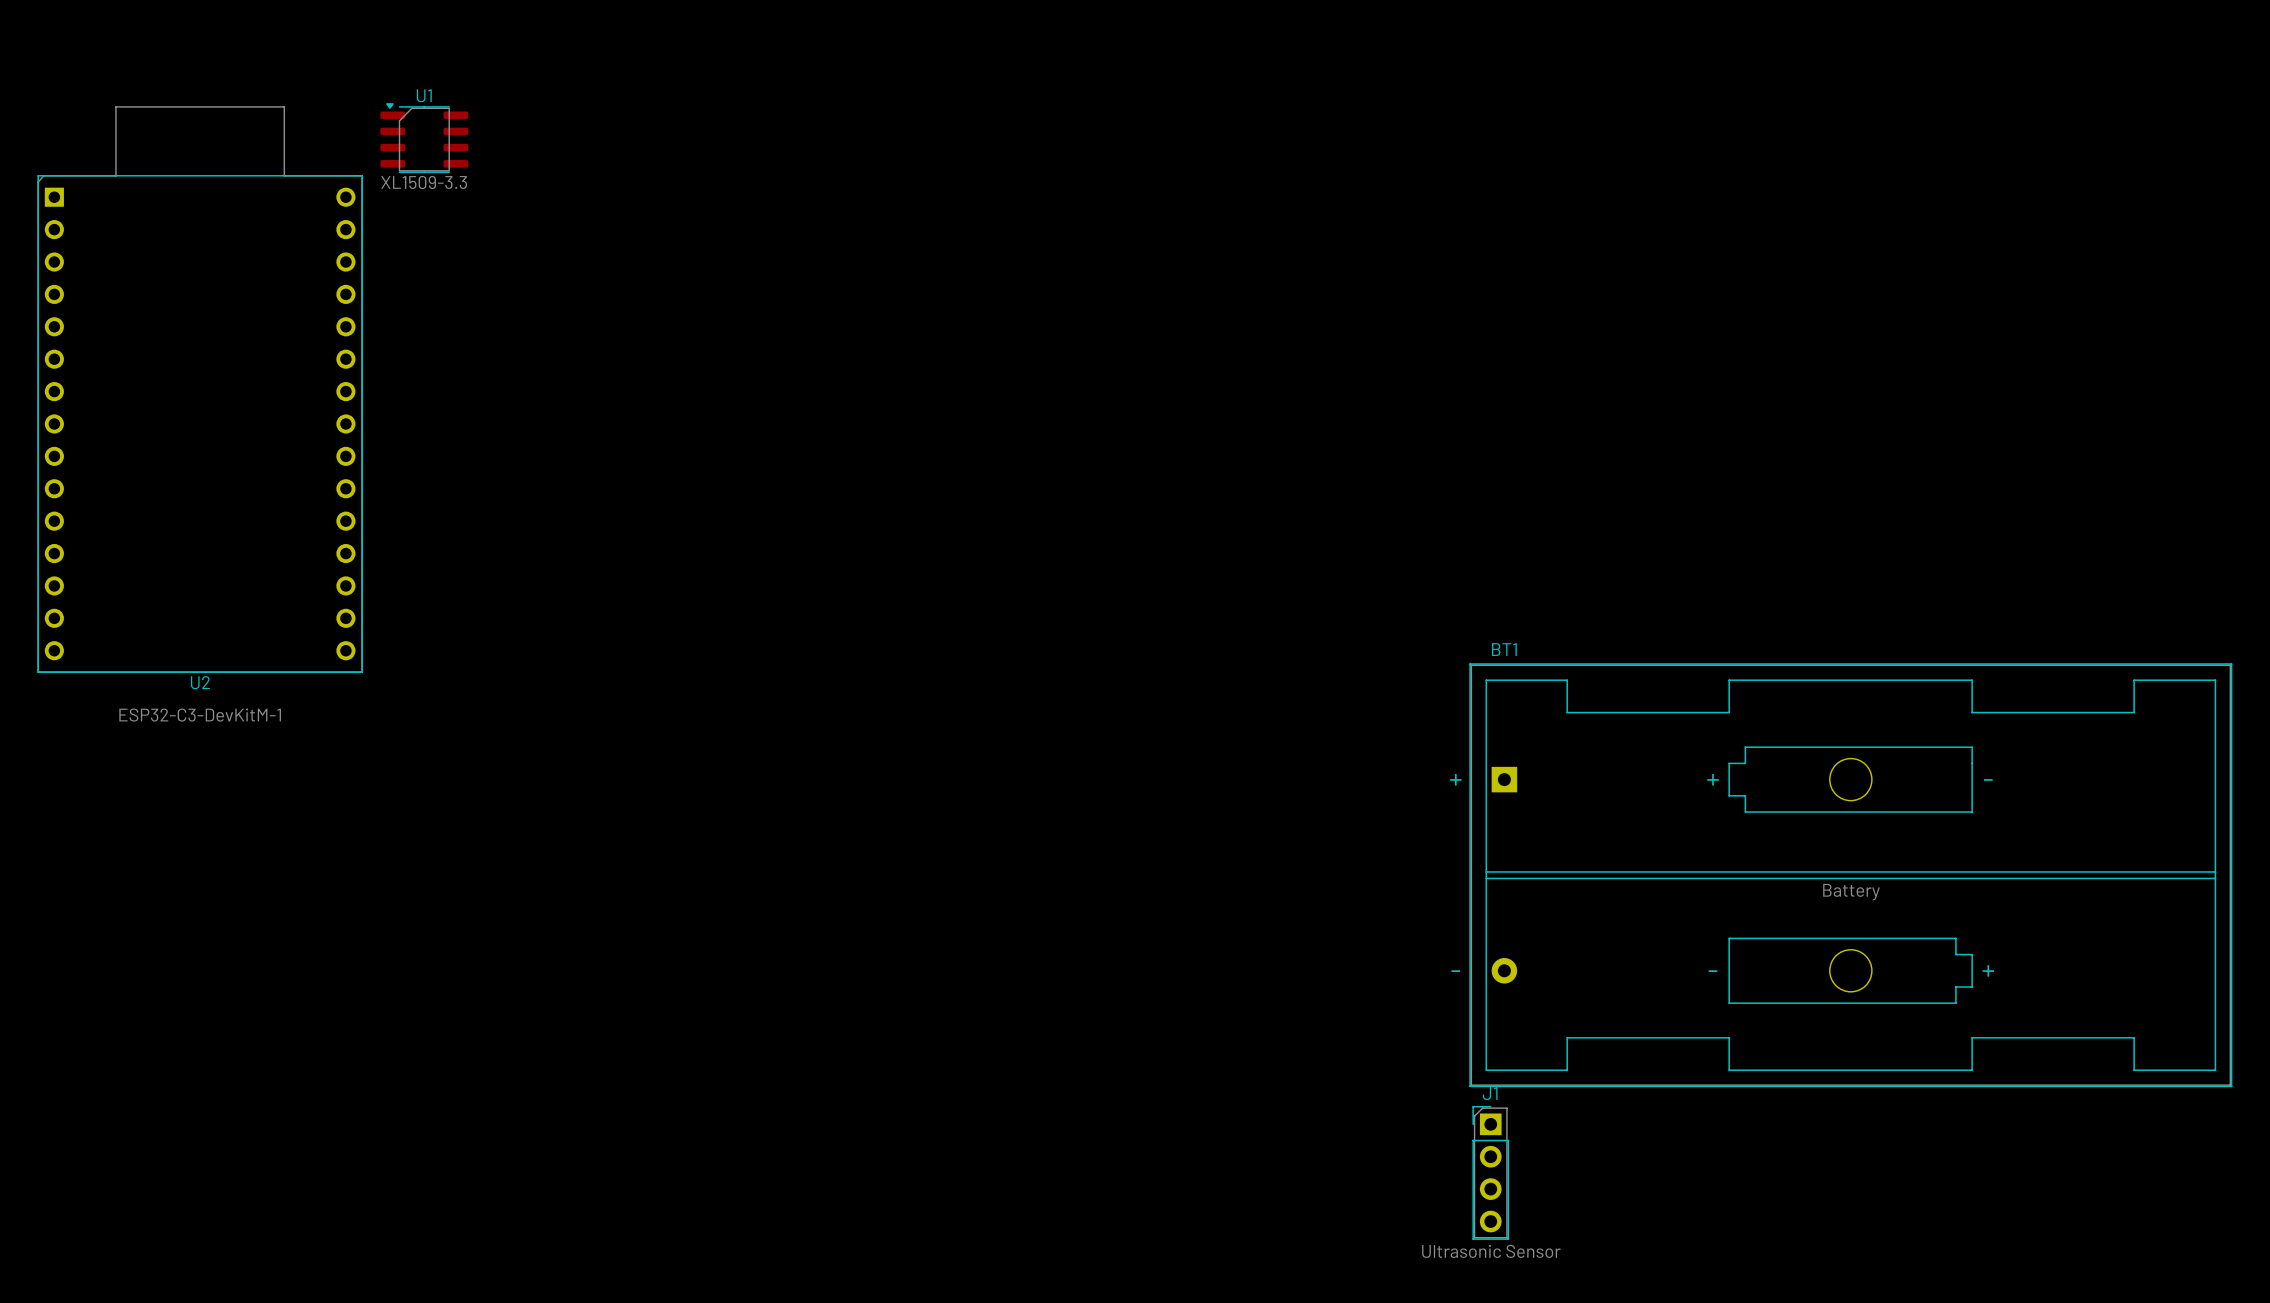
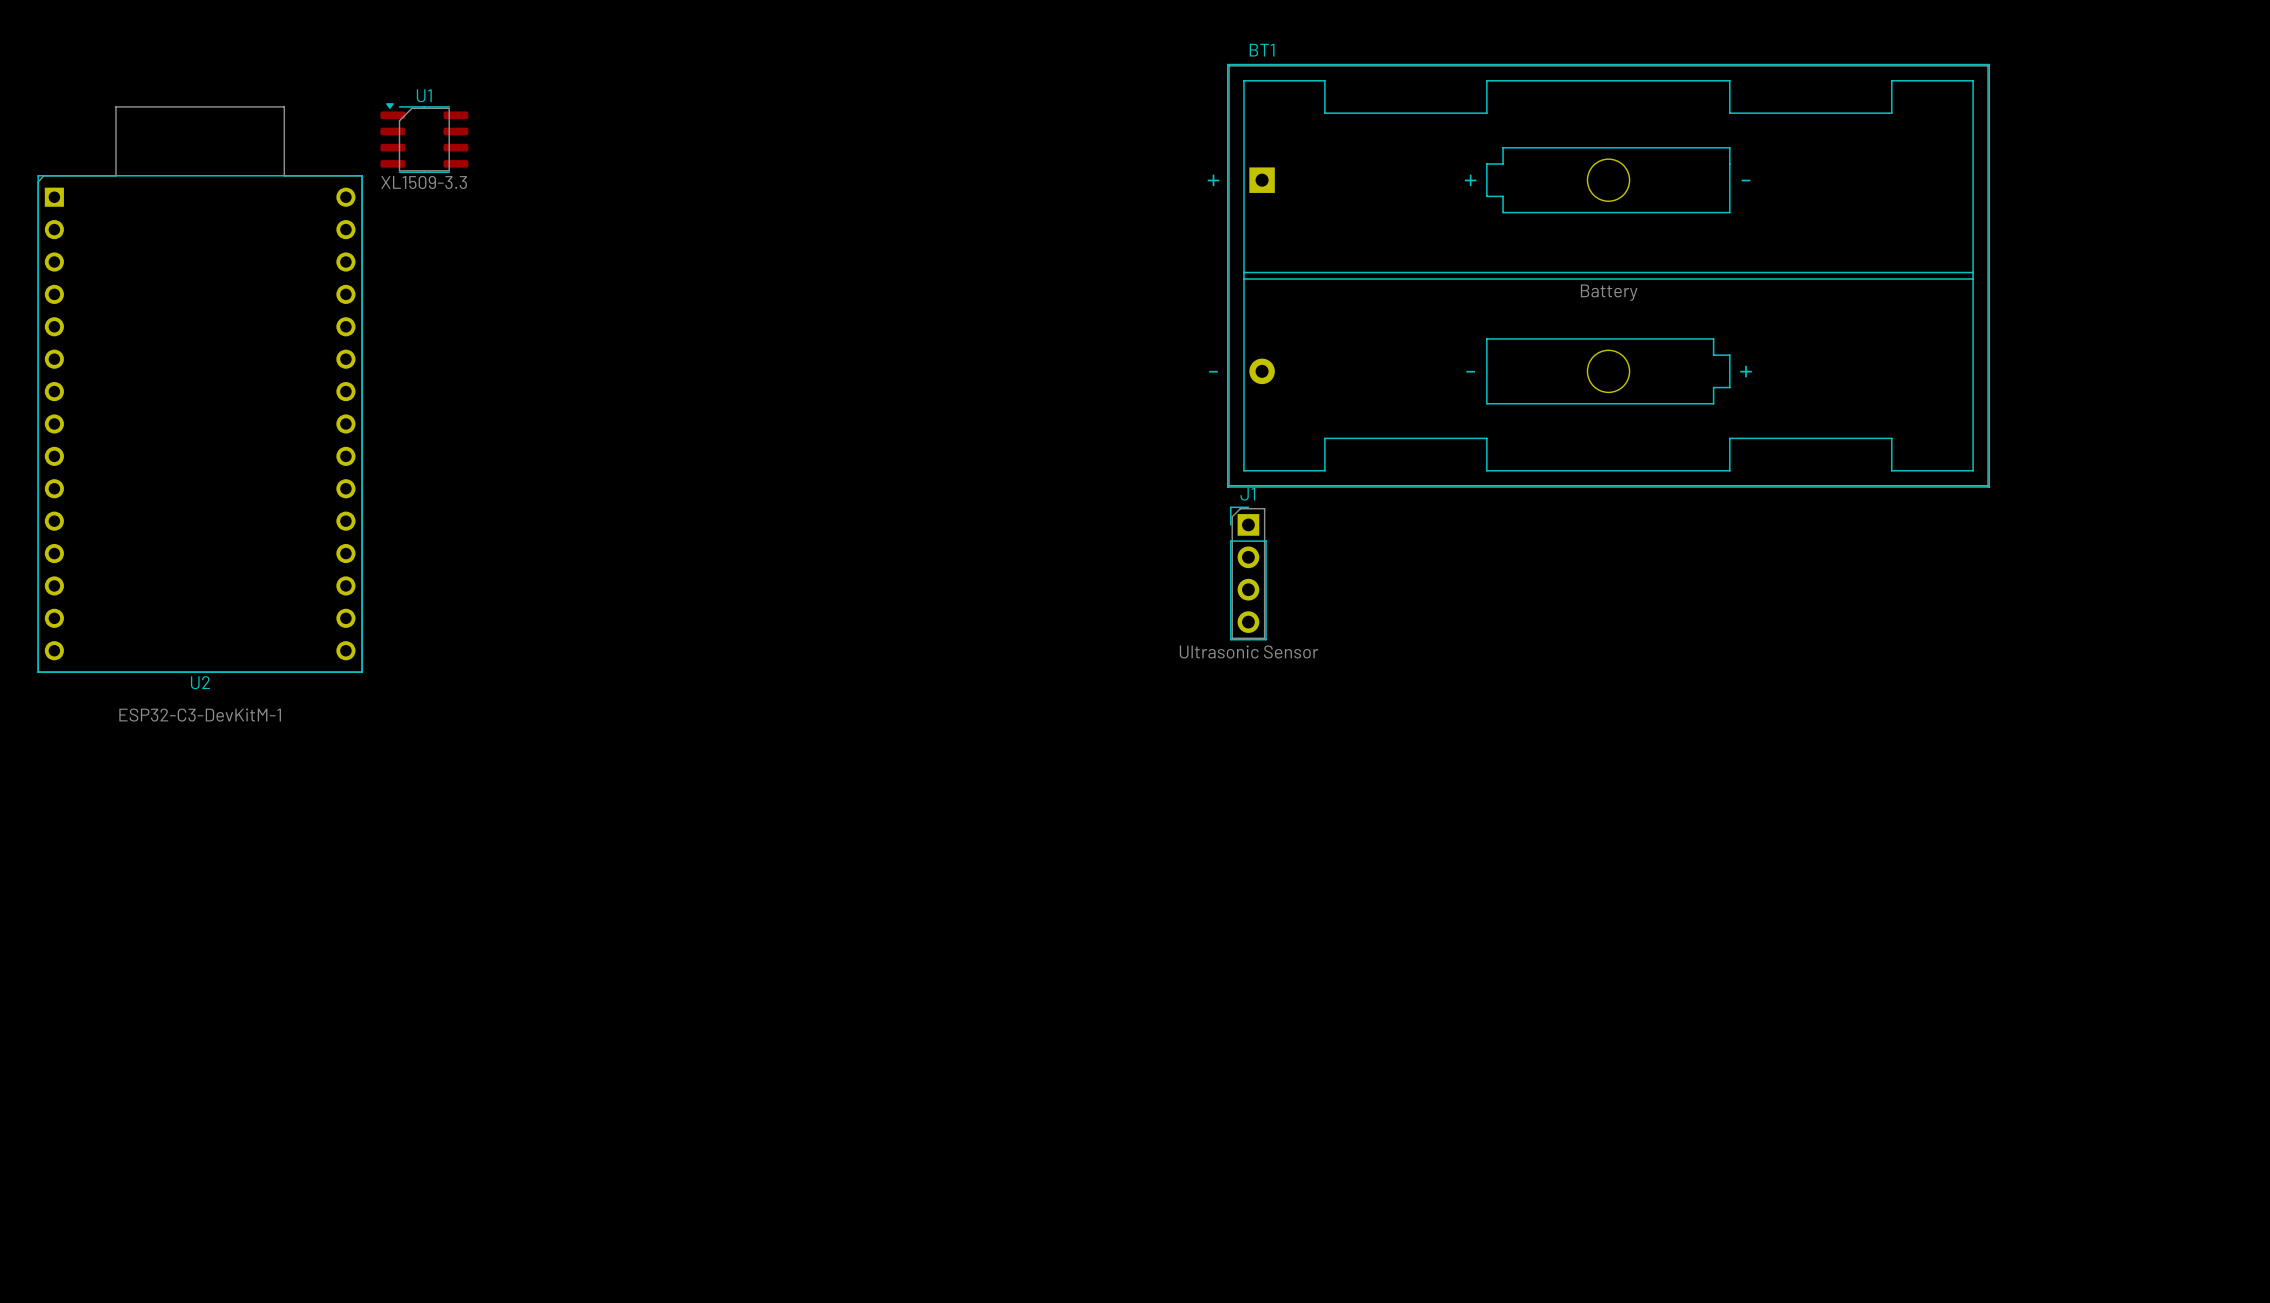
BT1 position: (1850, 875) -> (1608, 275)
J1 position: (1490, 1172) -> (1248, 573)

